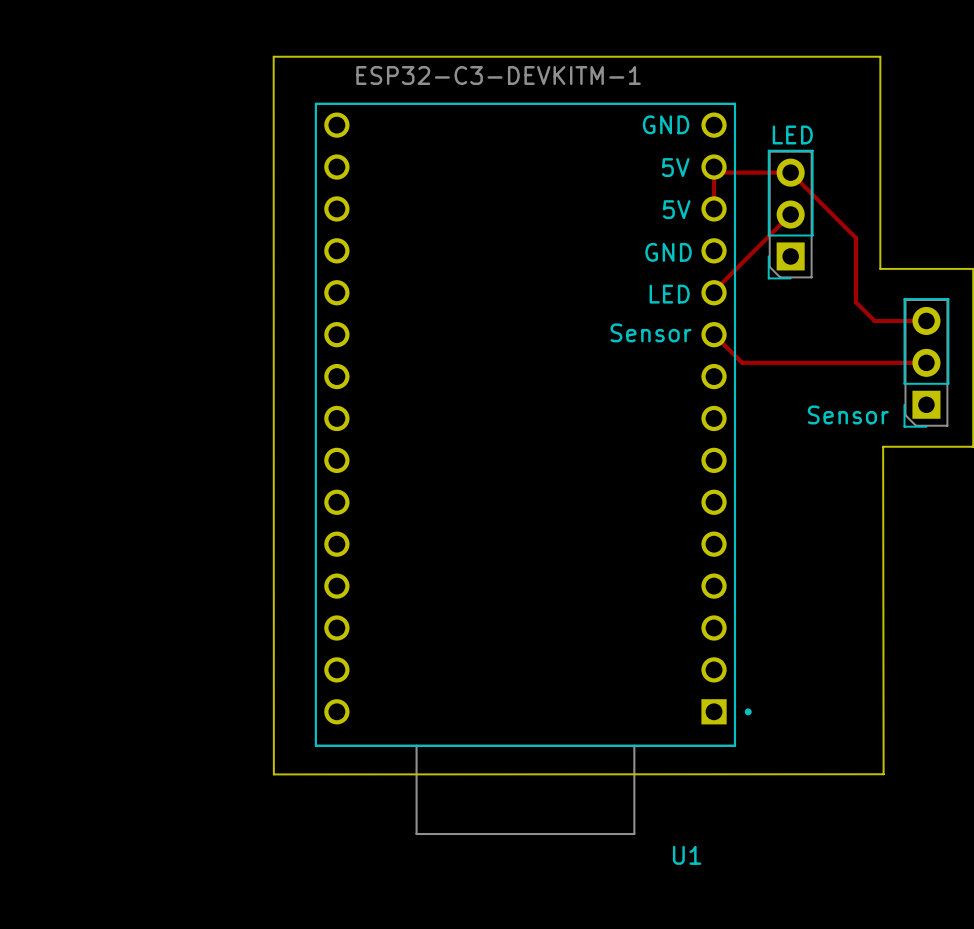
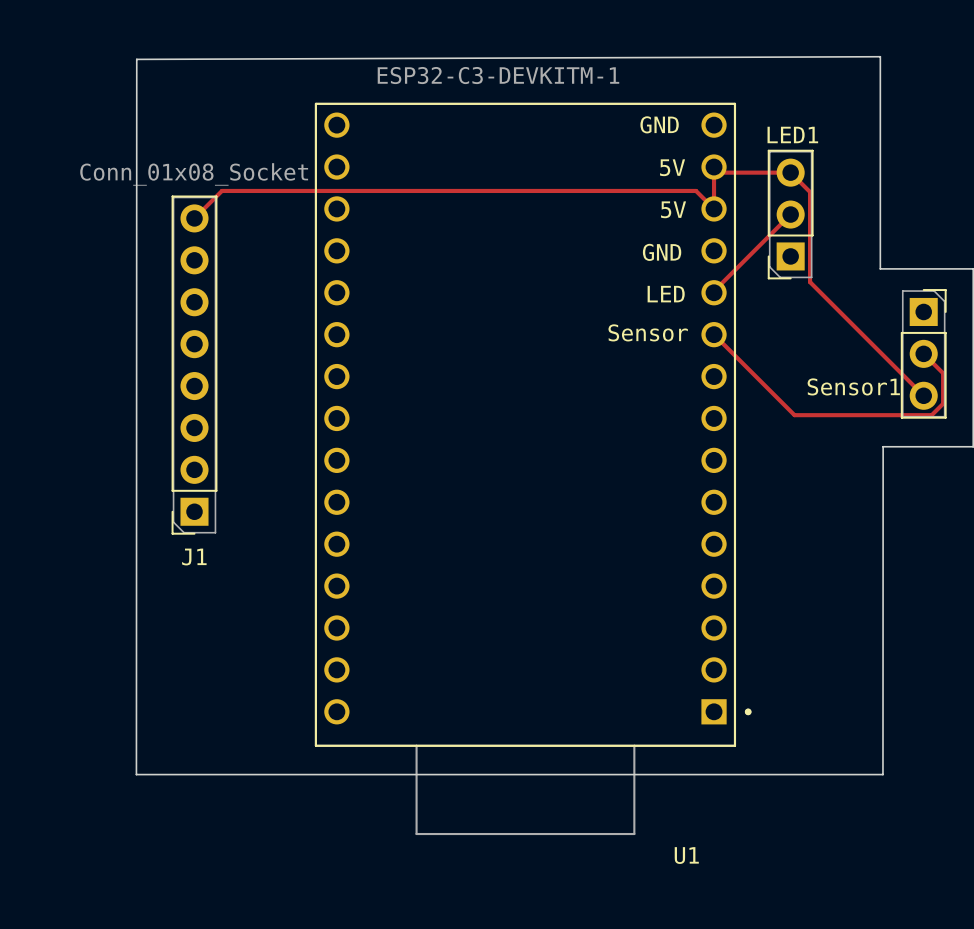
board edge: (880, 56) (273, 56) (273, 774) (883, 774) (883, 446) -> (880, 56) (136, 59) (136, 774) (882, 774) (883, 446)
LED name: LED (792, 134) -> LED1 (792, 134)
top track: (810, 192) (855, 237) (855, 302) (874, 320) (926, 320) -> (810, 192) (810, 282) (923, 395)
top track: none -> (714, 208) (696, 190) (221, 190) (194, 218)
Sensor1: none -> (923, 353)
top track: (742, 362) (926, 362) -> (742, 362) (794, 415) (931, 415) (943, 403) (943, 373) (923, 353)
Sensor: (926, 362) -> none
J1: none -> Conn_01x08_Socket (194, 365)

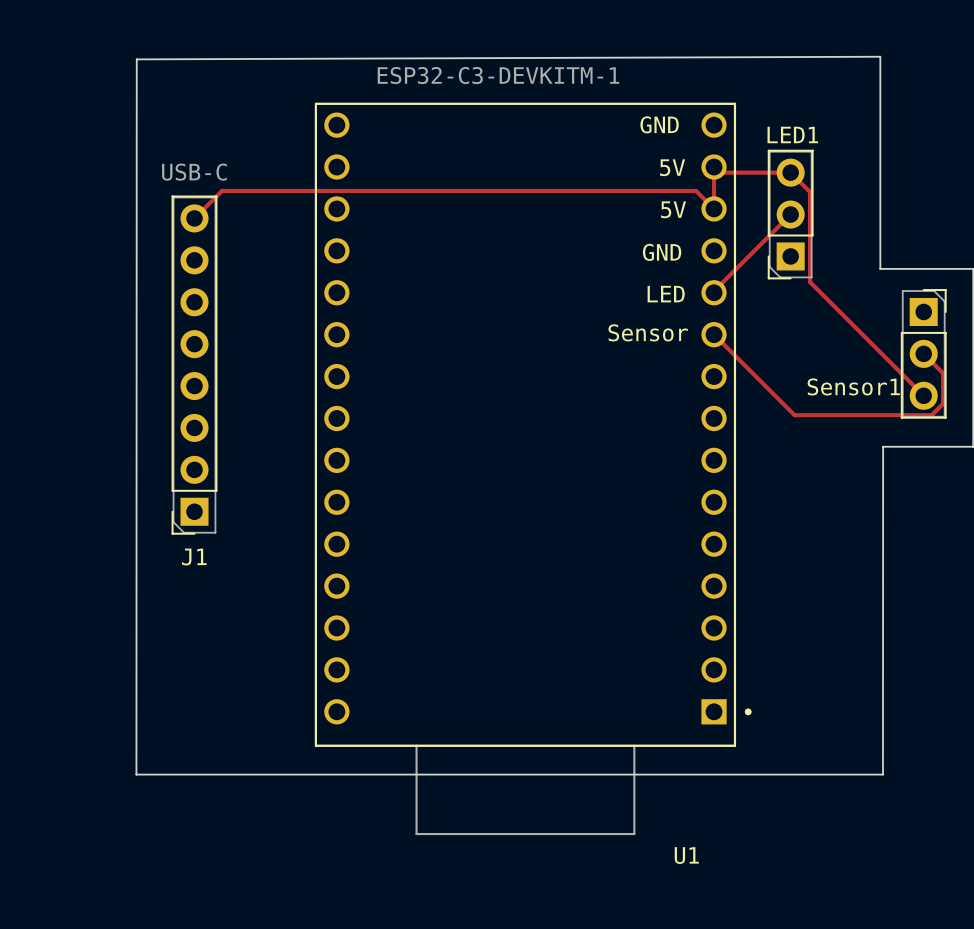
J1 value: Conn_01x08_Socket (194, 174) -> USB-C (194, 172)

